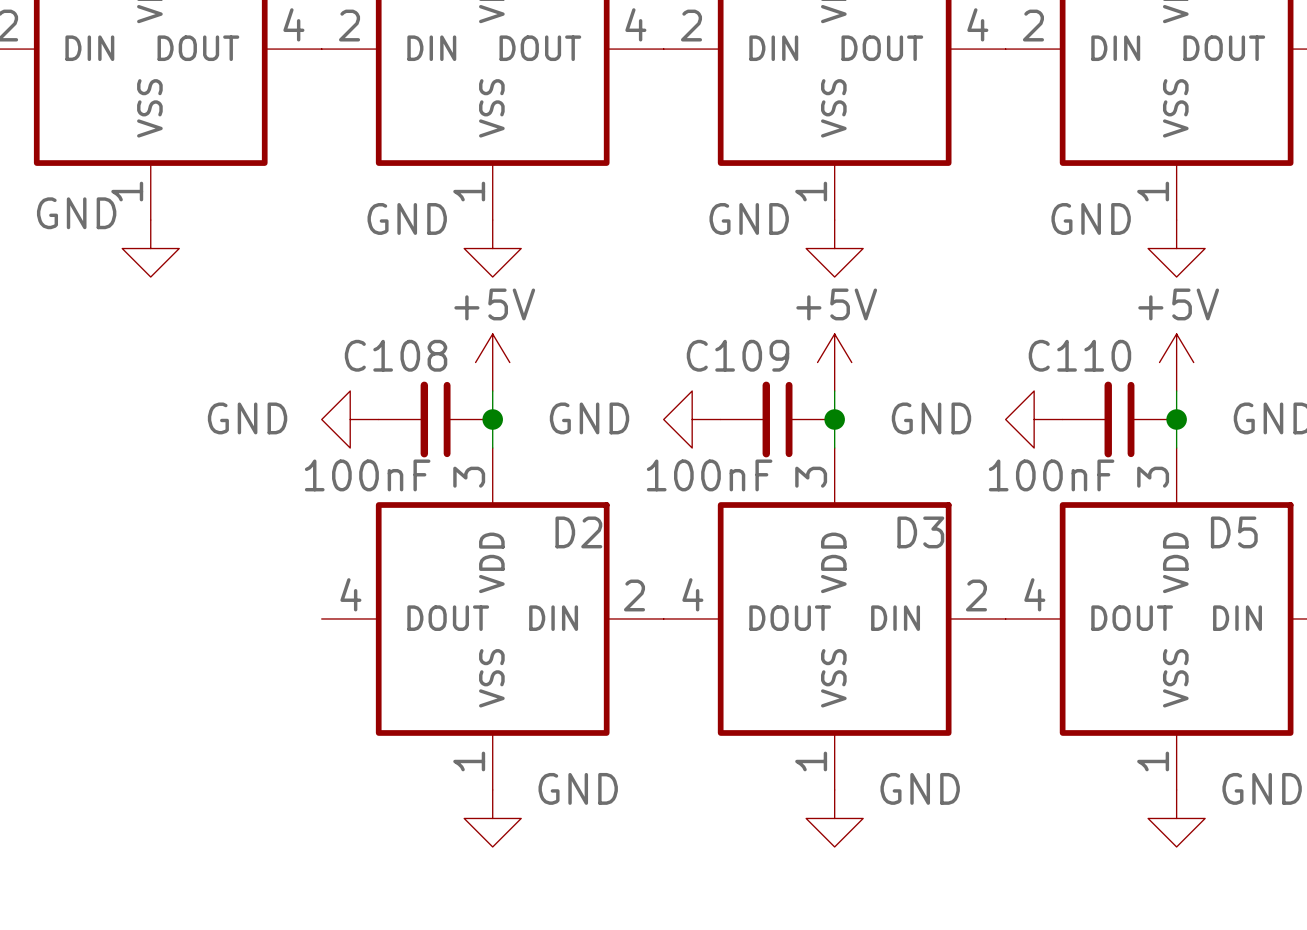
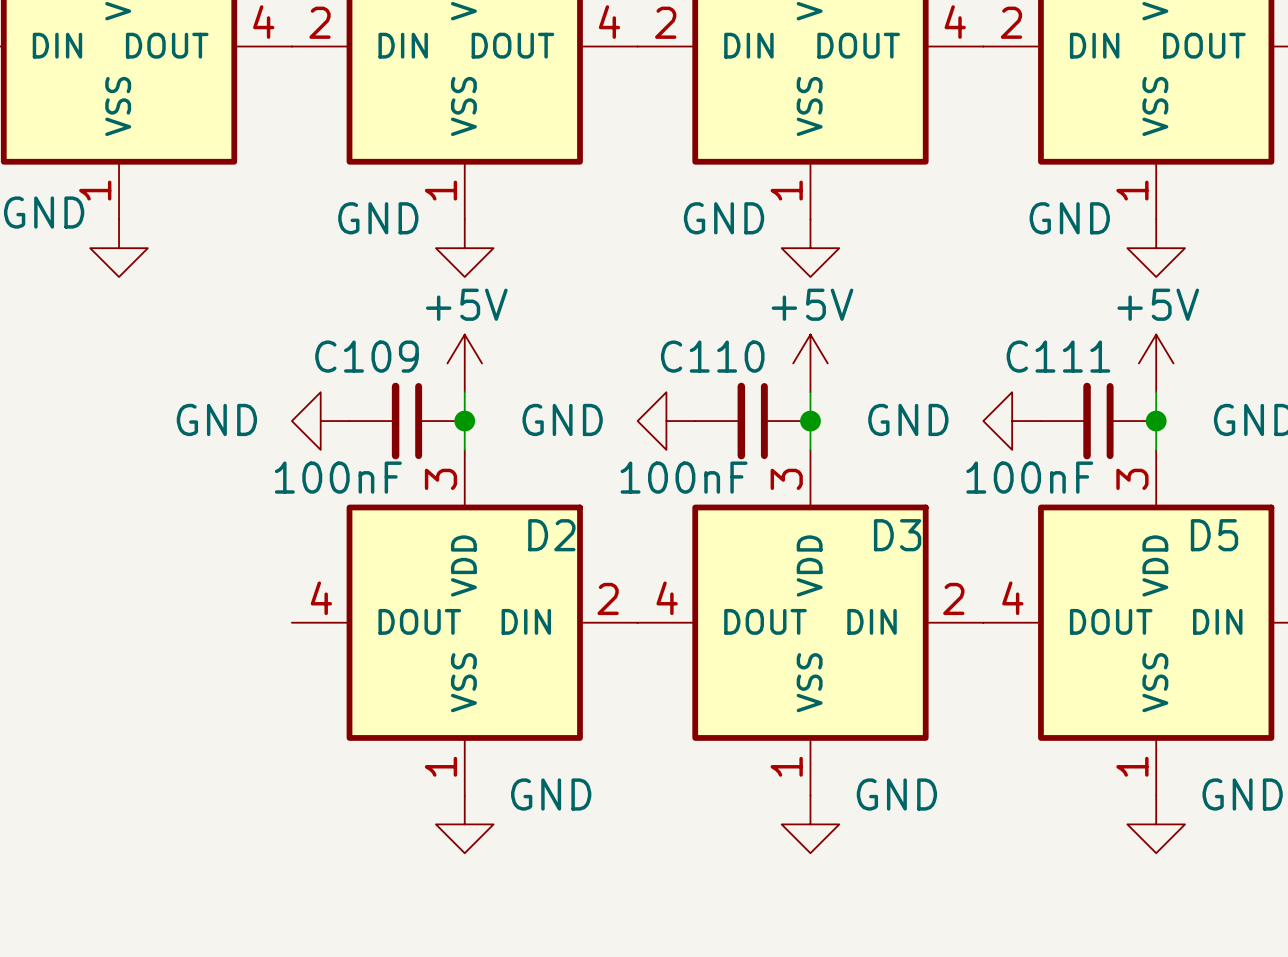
C108 name: C108 (396, 355) -> C109 (367, 356)
C109 name: C109 (737, 355) -> C110 (712, 356)
C110 name: C110 (1079, 355) -> C111 (1058, 356)

